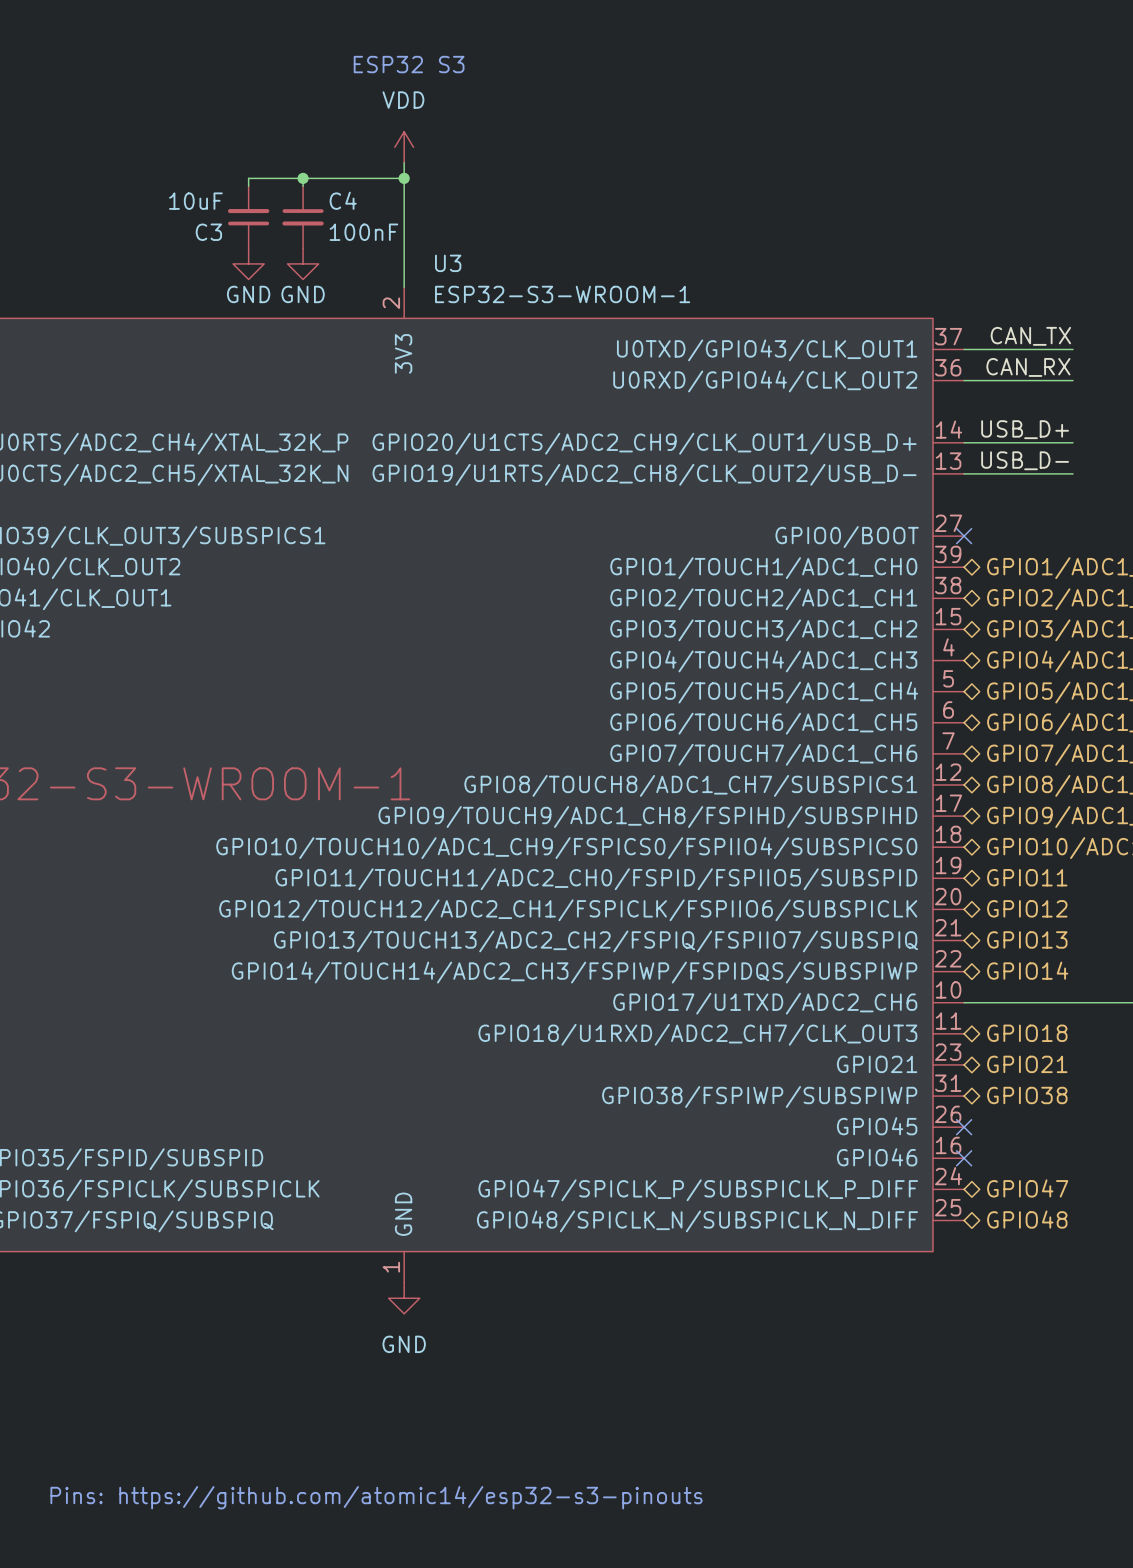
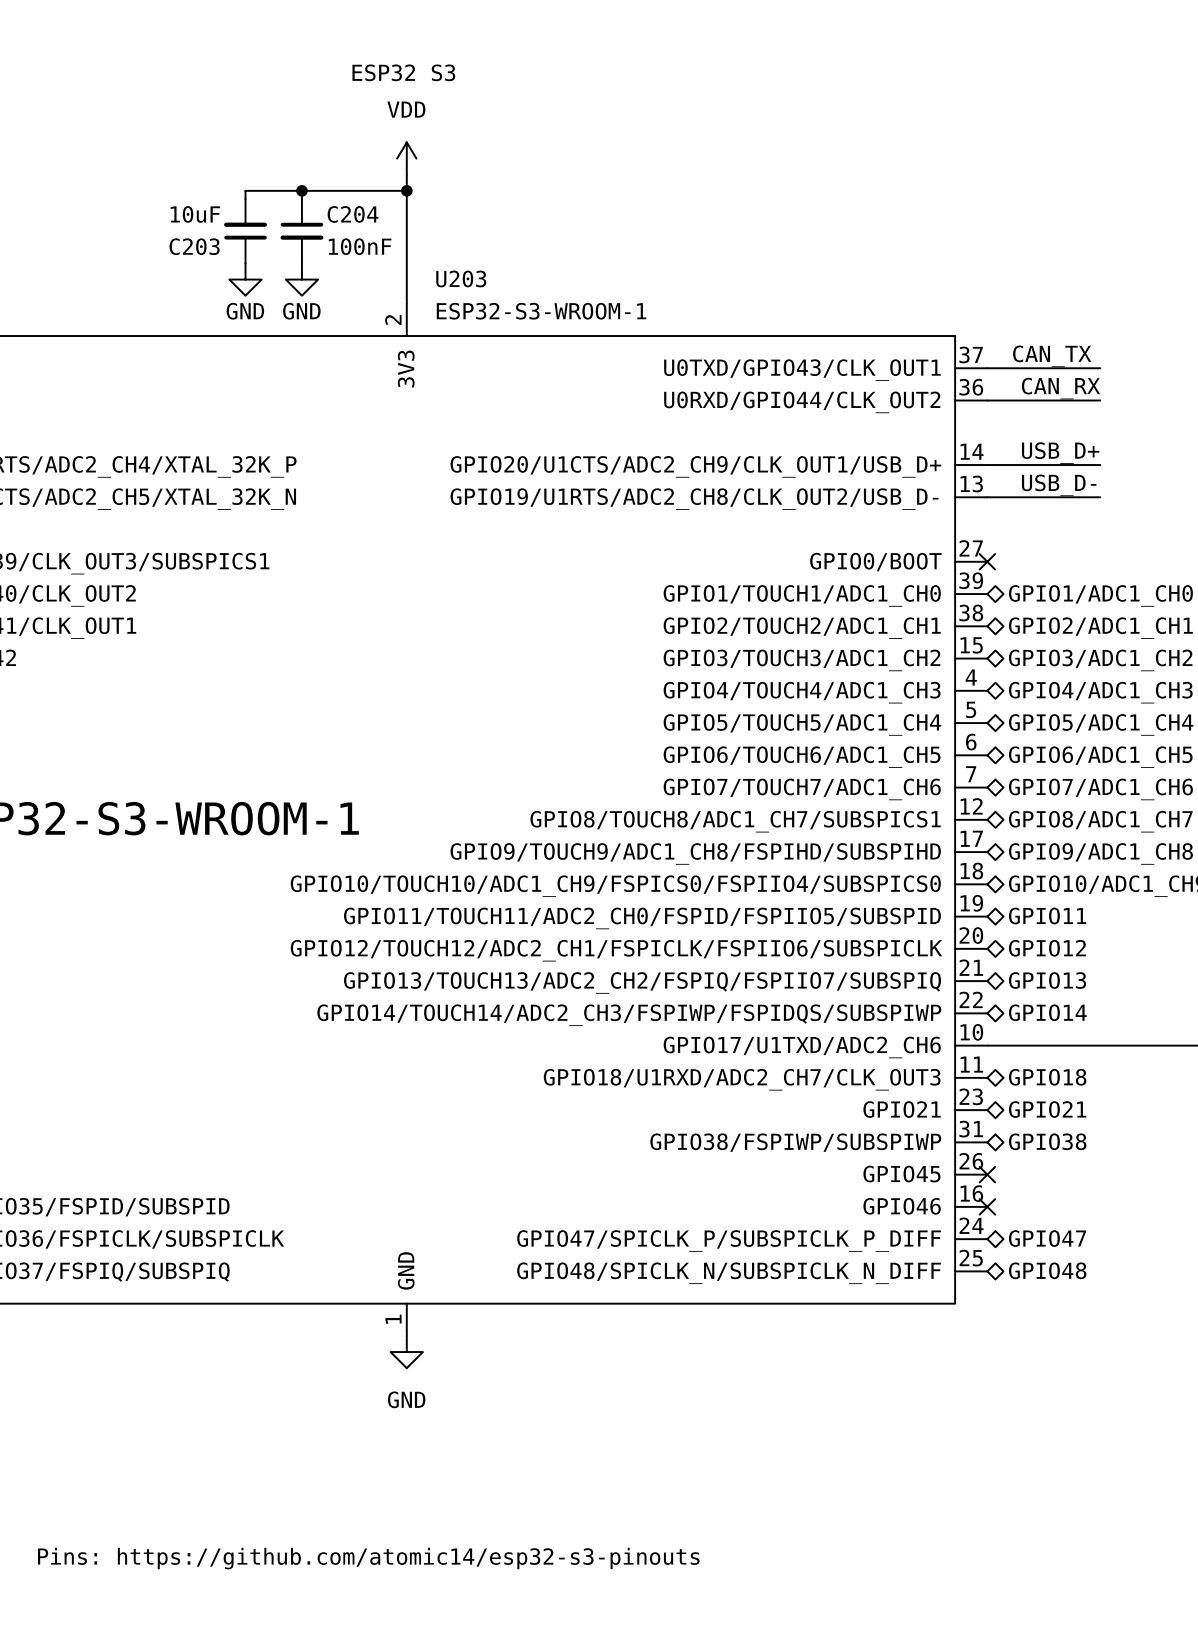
C4 name: C4 (343, 200) -> C204 (353, 214)
C3 name: C3 (208, 232) -> C203 (194, 246)
U3 name: U3 (448, 263) -> U203 (461, 278)

